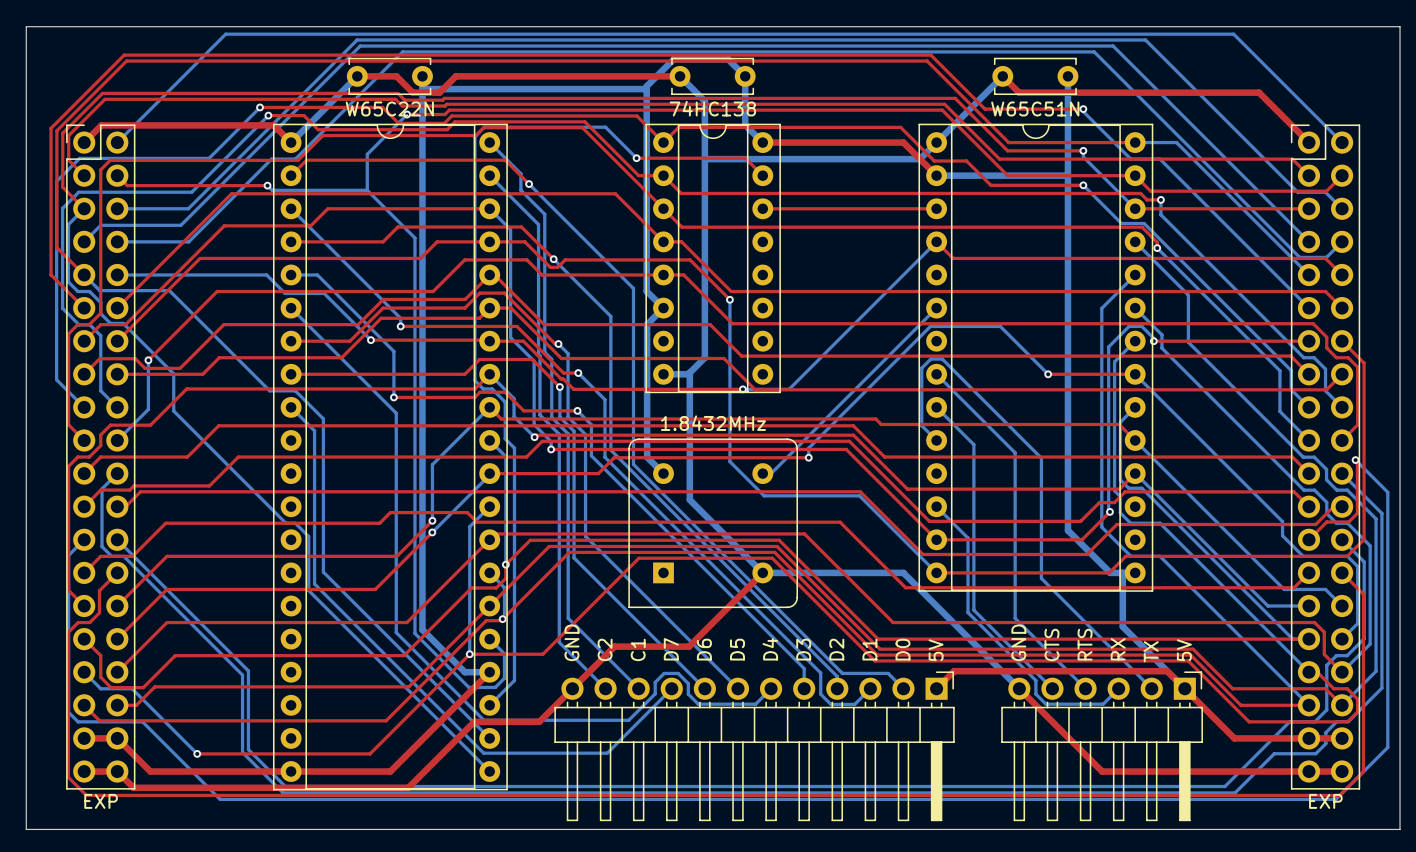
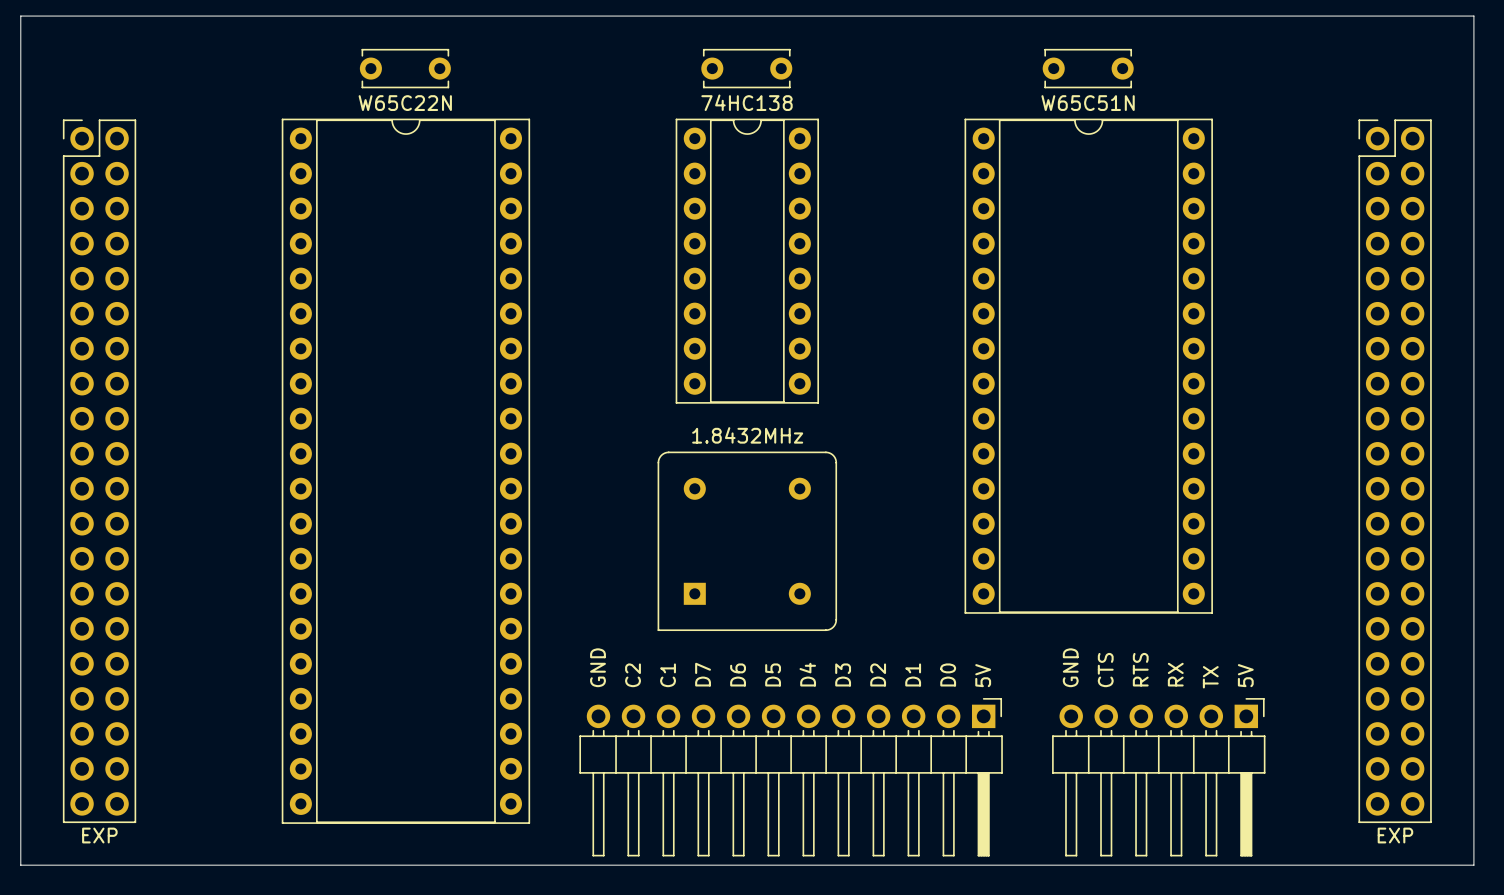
top track: (357, 76) (396, 76) (412, 92) (439, 92) (455, 76) (680, 76) -> none
bottom track: (357, 76) (291, 142) -> none
bottom track: (422, 76) (422, 629) (464, 672) (489, 672) -> none
bottom track: (680, 76) (704, 101) (704, 357) (688, 374) (663, 374) -> none
top track: (1002, 76) (1019, 92) (1259, 92) (1308, 142) -> none
bottom track: (1002, 76) (920, 159) (704, 159) -> none
bottom track: (1067, 76) (1067, 530) (1110, 572) (1135, 572) -> none
bottom track: (422, 89) (646, 89) -> none
top track: (260, 107) (382, 107) (398, 123) (444, 123) (451, 115) (636, 115) (663, 142) (678, 127) (900, 127) (934, 161) (966, 161) (990, 185) (1083, 185) -> none
bottom track: (260, 107) (209, 158) (79, 158) (56, 181) (56, 379) (84, 407) -> none
via: (260, 107) -> none
top track: (1083, 109) (984, 109) (930, 55) (124, 55) (51, 128) (51, 274) (84, 308) -> none
bottom track: (1083, 109) (1083, 111) (1130, 159) (1160, 159) (1308, 308) -> none
via: (1083, 109) -> none
top track: (407, 114) (444, 114) (449, 110) (942, 110) (1007, 175) (1135, 175) (1150, 191) (1326, 191) (1342, 175) -> none
bottom track: (407, 114) (367, 154) (367, 190) -> none
via: (407, 114) -> none
top track: (268, 115) (304, 115) (318, 129) (447, 129) (454, 121) (584, 121) (638, 175) (663, 175) (681, 193) (1140, 193) (1147, 199) (1160, 199) -> none
bottom track: (268, 115) (191, 192) (78, 192) (62, 208) (62, 308) (79, 324) (89, 324) (100, 335) (100, 390) (117, 407) -> none
via: (268, 115) -> none
top track: (84, 142) (101, 125) (273, 125) (291, 142) -> none
bottom track: (117, 142) (225, 34) (1233, 34) (1342, 142) -> none
bottom track: (489, 142) (520, 173) (520, 190) (544, 214) (544, 352) (551, 359) (551, 417) (568, 433) (568, 618) (638, 688) -> none
top track: (762, 142) (903, 142) (936, 175) -> none
bottom track: (762, 142) (745, 124) (745, 76) (728, 59) (673, 59) (646, 86) (646, 291) (663, 308) (647, 324) (647, 457) (663, 473) -> none
top track: (1135, 142) (1008, 142) (927, 61) (126, 61) (56, 130) (56, 247) (84, 274) -> none
bottom track: (1135, 142) (1176, 142) (1308, 274) -> none
top track: (1083, 150) (1007, 150) (955, 98) (444, 98) (442, 100) (404, 100) (397, 93) (102, 93) (62, 133) (62, 187) (84, 208) -> none
bottom track: (1083, 150) (1083, 156) (1135, 208) -> none
via: (1083, 150) -> none
top track: (636, 158) (745, 158) (762, 175) -> none
bottom track: (636, 158) (605, 127) (484, 127) (474, 136) (474, 380) (483, 388) (492, 388) (505, 402) (505, 438) (514, 448) (514, 680) (489, 705) -> none
via: (636, 158) -> none
top track: (84, 175) (68, 160) (68, 135) (105, 99) (395, 99) (402, 106) (445, 106) (446, 104) (944, 104) (999, 159) (1292, 159) (1308, 175) -> none
top track: (117, 175) (127, 185) (267, 185) -> none
top track: (291, 175) (306, 160) (505, 160) (529, 184) -> none
bottom track: (489, 175) (538, 224) (540, 415) (559, 434) (559, 642) (605, 688) -> none
bottom track: (936, 175) (1067, 175) -> none
bottom track: (529, 184) (633, 288) (633, 464) (842, 673) (888, 673) (903, 688) -> none
via: (529, 184) -> none
bottom track: (267, 185) (272, 190) (367, 190) -> none
via: (267, 185) -> none
bottom track: (1083, 185) (1121, 223) (1144, 223) (1291, 370) (1291, 389) (1308, 407) -> none
via: (1083, 185) -> none
bottom track: (367, 190) (414, 238) (414, 633) (468, 687) (495, 687) (504, 678) (504, 653) (489, 639) -> none
bottom track: (1160, 199) (1160, 214) (1303, 357) (1314, 357) (1325, 369) (1325, 390) (1342, 407) -> none
via: (1160, 199) -> none
bottom track: (84, 208) (68, 224) (68, 282) (77, 291) (89, 291) (100, 302) (100, 313) (110, 323) (123, 323) (173, 373) (173, 411) (285, 523) (295, 523) (308, 536) (308, 590) (489, 771) -> none
bottom track: (117, 208) (188, 208) (357, 40) (1145, 40) (1297, 192) (1325, 192) (1342, 208) -> none
bottom track: (291, 208) (400, 318) (400, 326) -> none
top track: (489, 208) (327, 208) (310, 225) (224, 225) (125, 324) (100, 324) (84, 341) -> none
bottom track: (489, 208) (510, 229) (510, 337) (534, 361) (534, 424) (551, 441) (551, 449) -> none
top track: (762, 208) (936, 208) -> none
top track: (1135, 208) (1308, 208) -> none
bottom track: (84, 241) (100, 225) (180, 225) (360, 46) (1113, 46) (1308, 241) -> none
bottom track: (117, 241) (188, 241) (271, 159) (295, 159) (402, 51) (1094, 51) (1299, 257) (1326, 257) (1342, 241) -> none
top track: (291, 241) (383, 241) (397, 227) (521, 227) (553, 259) -> none
top track: (936, 241) (953, 258) (1325, 258) (1342, 274) -> none
bottom track: (936, 241) (789, 389) (742, 389) -> none
bottom track: (1135, 241) (1188, 295) (1188, 342) (1303, 457) (1314, 457) (1326, 469) (1326, 479) (1336, 490) (1347, 490) (1376, 518) (1376, 671) (1342, 705) -> none
top track: (1157, 248) (1157, 242) (1142, 227) (681, 227) (582, 127) (483, 127) (475, 135) (322, 135) (298, 160) (110, 160) (100, 169) (100, 313) (89, 324) (77, 324) (68, 333) (68, 424) (84, 440) -> none
bottom track: (1157, 248) (1279, 370) (1279, 411) (1308, 440) -> none
via: (1157, 248) -> none
bottom track: (553, 259) (610, 316) (610, 450) (837, 676) (837, 688) -> none
via: (553, 259) -> none
bottom track: (84, 274) (99, 290) (169, 290) (269, 390) (295, 390) (323, 418) (323, 572) (489, 738) -> none
bottom track: (117, 274) (266, 274) (285, 293) (324, 293) (370, 340) -> none
bottom track: (291, 274) (317, 274) (393, 351) (393, 397) -> none
bottom track: (1135, 274) (1101, 308) (1101, 527) (1130, 556) (1160, 556) (1308, 705) -> none
top track: (729, 299) (690, 259) (565, 259) (557, 267) (550, 267) (524, 241) (437, 241) (420, 258) (200, 258) (117, 341) -> none
bottom track: (729, 299) (729, 461) (764, 495) (859, 495) (936, 572) -> none
via: (729, 299) -> none
top track: (117, 308) (231, 193) (615, 193) (663, 241) (681, 241) (731, 291) (1325, 291) (1342, 308) -> none
bottom track: (291, 308) (396, 413) (396, 632) (483, 720) (628, 720) (655, 693) (655, 682) (664, 673) (678, 673) (688, 683) (688, 694) (698, 704) (755, 704) (771, 688) -> none
bottom track: (936, 308) (771, 473) (762, 473) -> none
bottom track: (1135, 308) (1161, 334) (1161, 348) (1303, 490) (1314, 490) (1326, 502) (1326, 513) (1336, 523) (1347, 523) (1370, 545) (1370, 644) (1342, 672) -> none
top track: (400, 326) (516, 326) (563, 373) (578, 373) -> none
via: (400, 326) -> none
top track: (370, 340) (523, 341) (573, 389) (742, 389) -> none
via: (370, 340) -> none
top track: (291, 341) (349, 341) (383, 308) (464, 308) (479, 293) (504, 293) (555, 344) (558, 344) -> none
bottom track: (1135, 341) (1114, 361) (1114, 490) (1120, 496) (1120, 512) (1130, 523) (1160, 523) (1308, 672) -> none
top track: (1153, 341) (1308, 341) -> none
bottom track: (1153, 341) (1153, 338) (1141, 326) (1129, 326) (1108, 346) (1109, 511) -> none
via: (1153, 341) -> none
top track: (1342, 341) (1364, 363) (1364, 539) (1347, 556) (1125, 556) (1109, 572) (936, 572) -> none
bottom track: (558, 344) (568, 353) (568, 417) (585, 434) (585, 536) (737, 688) -> none
via: (558, 344) -> none
top track: (148, 360) (217, 291) (433, 291) (464, 259) (526, 259) (541, 274) (683, 274) (732, 323) (1313, 323) (1326, 337) (1326, 348) (1336, 357) (1348, 357) (1357, 367) (1357, 424) (1342, 440) -> none
bottom track: (148, 360) (148, 409) (117, 440) -> none
via: (148, 360) -> none
bottom track: (689, 372) (689, 499) (762, 572) (903, 572) (1019, 688) -> none
bottom track: (578, 373) (604, 399) (604, 457) (820, 673) (820, 694) (830, 704) (854, 704) (870, 688) -> none
via: (578, 373) -> none
top track: (84, 374) (99, 358) (135, 358) (145, 368) (180, 368) (223, 324) (358, 324) (383, 299) (465, 299) (489, 274) (494, 274) (544, 324) (710, 324) (741, 356) (1290, 356) (1308, 374) -> none
top track: (117, 374) (202, 374) (219, 357) (341, 357) (381, 318) (479, 318) (489, 308) (511, 308) (561, 358) (723, 358) (755, 389) (1326, 389) (1342, 374) -> none
top track: (291, 374) (464, 374) (479, 359) (532, 359) (559, 387) -> none
top track: (489, 374) (475, 388) (186, 388) (150, 425) (110, 425) (100, 434) (100, 445) (89, 457) (77, 457) (68, 466) (68, 590) (84, 606) -> none
bottom track: (489, 374) (514, 398) (514, 416) (534, 437) -> none
bottom track: (936, 374) (1015, 452) (1015, 618) (1085, 688) -> none
top track: (1048, 374) (1135, 374) -> none
bottom track: (1048, 374) (1000, 326) (930, 326) (808, 448) (808, 457) -> none
via: (1048, 374) -> none
bottom track: (1135, 374) (1282, 521) (1282, 535) (1303, 556) (1347, 556) (1357, 566) (1357, 623) (1342, 639) -> none
bottom track: (559, 387) (559, 417) (574, 431) (574, 557) (704, 688) -> none
via: (559, 387) -> none
via: (742, 389) -> none
top track: (393, 397) (474, 397) (480, 392) (505, 392) (523, 410) (577, 410) -> none
via: (393, 397) -> none
bottom track: (291, 407) (314, 430) (314, 584) (483, 753) (607, 753) (671, 688) -> none
top track: (489, 407) (501, 419) (875, 419) (881, 424) (1119, 424) (1135, 440) -> none
bottom track: (489, 407) (432, 464) (432, 520) -> none
bottom track: (936, 407) (973, 444) (973, 610) (1052, 688) -> none
bottom track: (1135, 407) (1120, 422) (1120, 479) (1128, 488) (1141, 488) (1292, 639) (1308, 639) -> none
bottom track: (577, 410) (591, 424) (591, 455) (804, 668) (804, 688) -> none
via: (577, 410) -> none
top track: (534, 437) (536, 435) (853, 435) (907, 489) (1119, 489) (1135, 473) -> none
via: (534, 437) -> none
bottom track: (489, 440) (505, 456) (505, 564) -> none
bottom track: (936, 440) (921, 425) (921, 368) (930, 359) (942, 359) (1041, 458) (1041, 578) (1151, 688) -> none
bottom track: (1135, 440) (1284, 589) (1325, 589) (1342, 606) -> none
top track: (551, 449) (846, 449) (936, 539) (1082, 539) (1109, 511) -> none
via: (551, 449) -> none
top track: (808, 457) (614, 457) (598, 473) (489, 473) -> none
via: (808, 457) -> none
top track: (1355, 460) (1357, 461) (1357, 513) (1348, 522) (1326, 522) (1308, 539) -> none
bottom track: (1355, 460) (1387, 492) (1387, 747) (1335, 799) (220, 799) (142, 721) (78, 721) (68, 712) (68, 555) (84, 539) -> none
via: (1355, 460) -> none
top track: (84, 473) (100, 457) (187, 457) (218, 425) (853, 425) (884, 457) (1292, 457) (1308, 473) -> none
bottom track: (117, 473) (102, 488) (102, 546) (111, 556) (123, 556) (242, 675) (242, 752) (283, 792) (1235, 792) (1274, 753) (1315, 753) (1325, 743) (1325, 732) (1336, 721) (1348, 721) (1381, 688) (1381, 513) (1342, 473) -> none
bottom track: (489, 473) (432, 532) -> none
bottom track: (1135, 473) (1267, 606) (1308, 606) -> none
top track: (84, 506) (100, 490) (129, 490) (133, 485) (209, 485) (238, 457) (526, 457) (542, 441) (849, 441) (929, 521) (1080, 521) (1099, 502) (1114, 502) (1125, 491) (1294, 491) (1308, 506) -> none
top track: (117, 506) (125, 506) (140, 491) (860, 491) (923, 554) (1086, 554) (1116, 524) (1315, 524) (1333, 506) (1342, 506) -> none
bottom track: (489, 506) (469, 526) (469, 654) -> none
bottom track: (936, 506) (968, 538) (968, 612) (1035, 680) (1035, 694) (1045, 704) (1103, 704) (1118, 688) -> none
via: (1109, 511) -> none
top track: (432, 520) (396, 556) (166, 556) (117, 606) -> none
via: (432, 520) -> none
top track: (432, 532) (375, 589) (166, 589) (117, 639) -> none
via: (432, 532) -> none
bottom track: (117, 539) (248, 670) (248, 749) (285, 786) (1224, 786) (1289, 721) (1314, 721) (1326, 709) (1326, 665) (1336, 655) (1347, 655) (1364, 638) (1364, 561) (1342, 539) -> none
via: (505, 564) -> none
top track: (84, 572) (100, 556) (132, 556) (165, 523) (379, 523) (390, 512) (467, 512) (476, 522) (840, 522) (905, 587) (1294, 587) (1308, 572) -> none
top track: (117, 572) (99, 590) (99, 612) (89, 622) (78, 622) (68, 632) (68, 777) (86, 795) (1339, 795) (1363, 771) (1363, 594) (1342, 572) -> none
bottom track: (489, 572) (504, 587) (504, 617) (502, 619) -> none
top track: (762, 572) (689, 646) (614, 646) (539, 721) (474, 721) (408, 787) (133, 787) (117, 771) (84, 771) -> none
bottom track: (1122, 572) (1122, 626) (1184, 688) -> none
via: (502, 619) -> none
top track: (84, 639) (100, 655) (100, 677) (111, 687) (143, 687) (175, 655) (403, 655) (471, 587) (496, 587) (505, 578) (505, 564) (530, 540) (779, 540) (878, 639) (1308, 639) -> none
via: (469, 654) -> none
bottom track: (84, 672) (100, 688) (132, 688) (197, 753) -> none
top track: (117, 672) (166, 622) (406, 622) (495, 533) (804, 533) (893, 622) (1314, 622) (1324, 632) (1324, 654) (1342, 672) -> none
top track: (489, 672) (390, 771) (150, 771) (117, 738) (84, 738) -> none
top track: (1308, 672) (1317, 672) (1333, 688) (1347, 688) (1357, 699) (1357, 711) (1347, 721) (1249, 721) (1188, 660) (874, 660) (772, 558) (638, 558) (542, 654) (469, 654) (370, 753) (197, 753) -> none
top track: (936, 688) (954, 671) (1167, 671) (1234, 738) (1342, 738) -> none
top track: (1019, 688) (1102, 771) (1342, 771) -> none
top track: (84, 705) (99, 720) (386, 720) (486, 620) (501, 620) (569, 552) (774, 552) (877, 655) (1190, 655) (1240, 705) (1308, 705) -> none
top track: (117, 705) (136, 705) (154, 686) (408, 686) (549, 546) (777, 546) (879, 649) (1193, 649) (1232, 688) (1325, 688) (1342, 705) -> none
via: (197, 753) -> none

